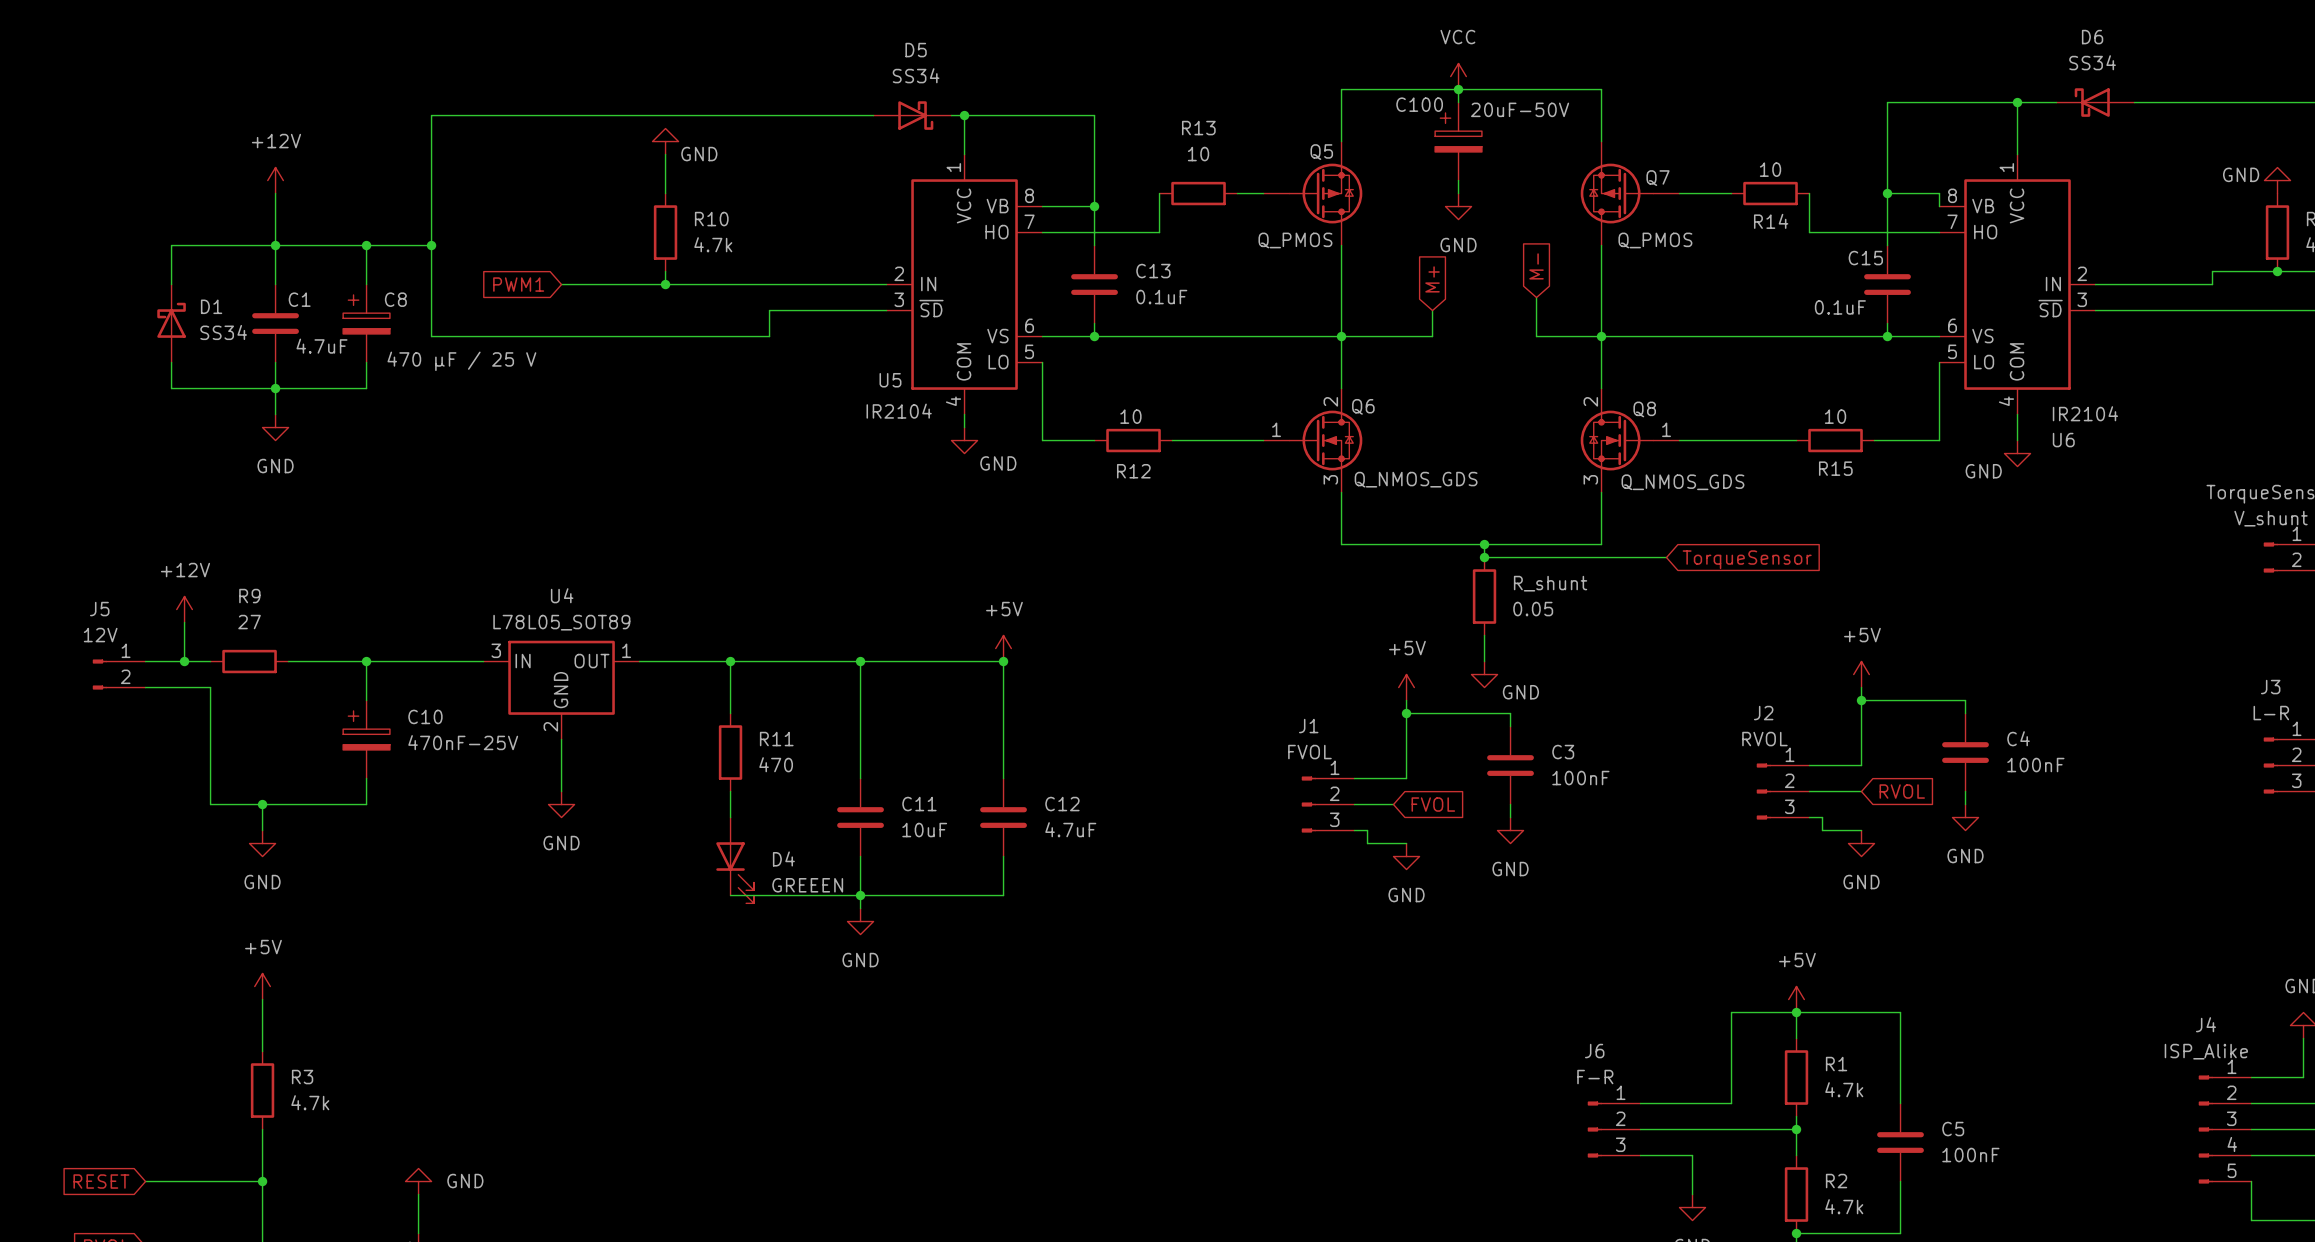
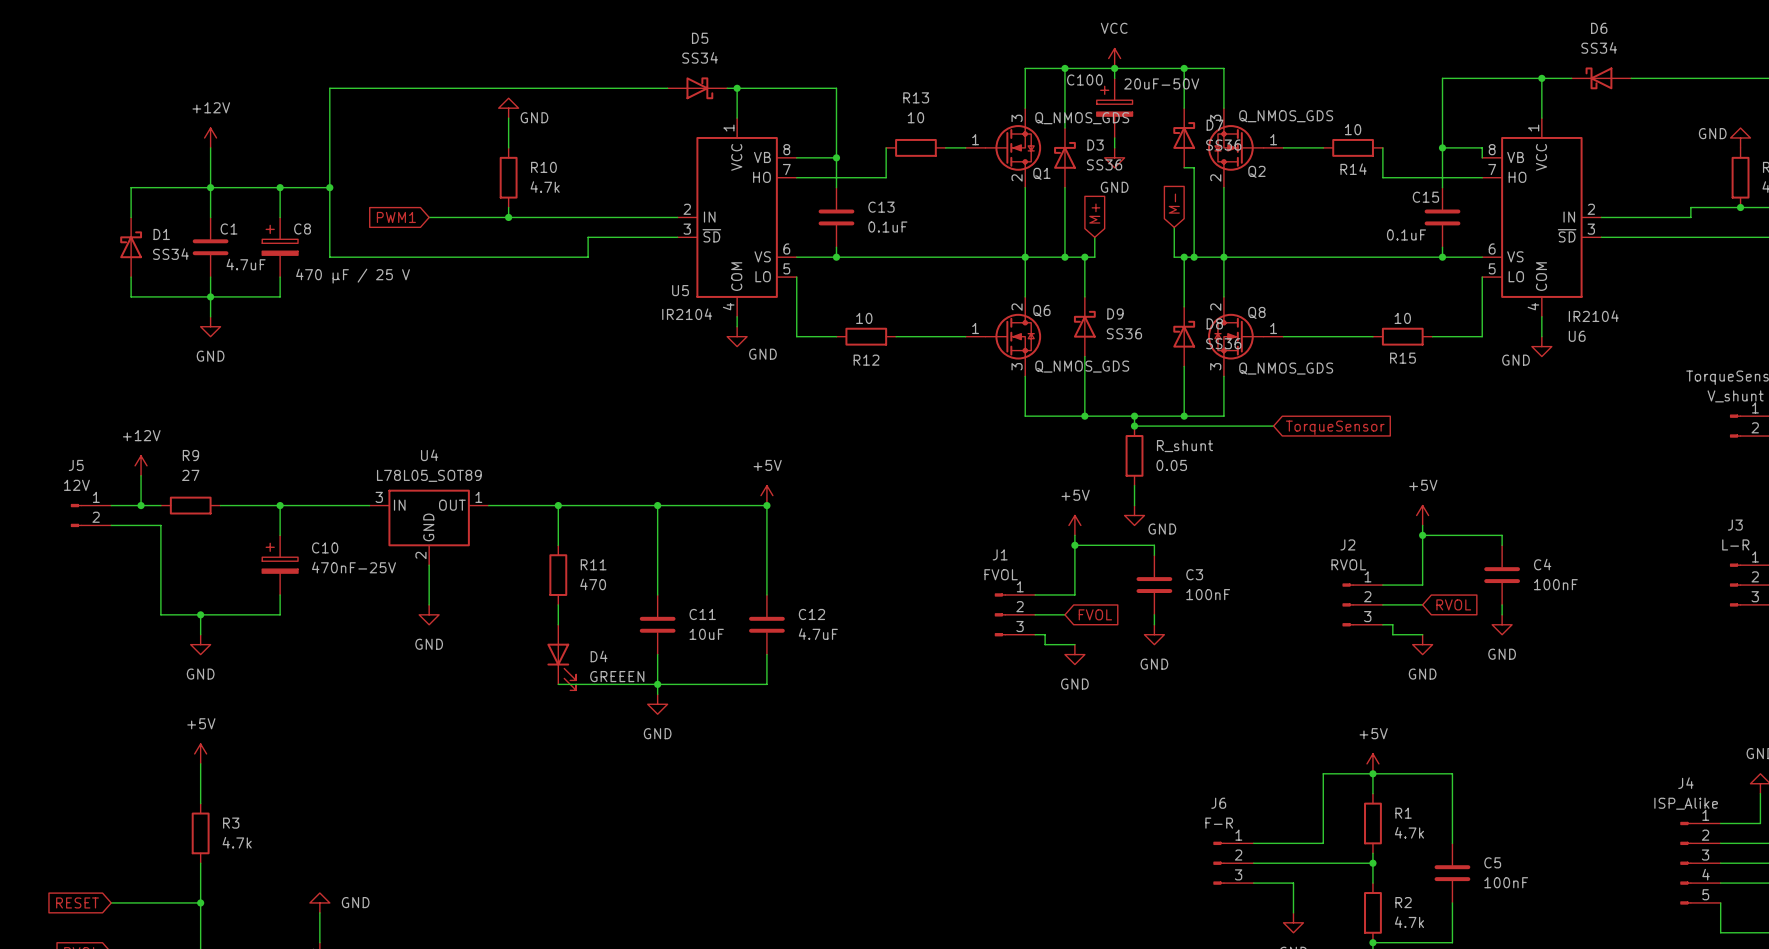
wire: none -> (1064, 68) (1064, 128)
junction: none -> (1064, 68)
wire: none -> (1184, 68) (1184, 108)
junction: none -> (1184, 68)
D7: none -> SS36 (1184, 137)
Q5: Q_PMOS (1312, 193) -> none
Q1: none -> Q_NMOS_GDS (1003, 147)
Q7: Q_PMOS (1630, 193) -> none
Q2: none -> Q_NMOS_GDS (1245, 147)
D3: none -> SS36 (1064, 157)
wire: none -> (1184, 167) (1194, 167) (1194, 257)
wire: none -> (1064, 187) (1064, 257)
junction: none -> (1064, 257)
wire: none -> (1084, 257) (1084, 296)
junction: none -> (1084, 257)
wire: none -> (1184, 257) (1184, 306)
junction: none -> (1184, 257)
junction: none -> (1194, 257)
D9: none -> SS36 (1084, 326)
D8: none -> SS36 (1184, 336)
wire: none -> (1084, 356) (1084, 416)
wire: none -> (1184, 366) (1184, 416)
junction: none -> (1084, 416)
junction: none -> (1184, 416)

